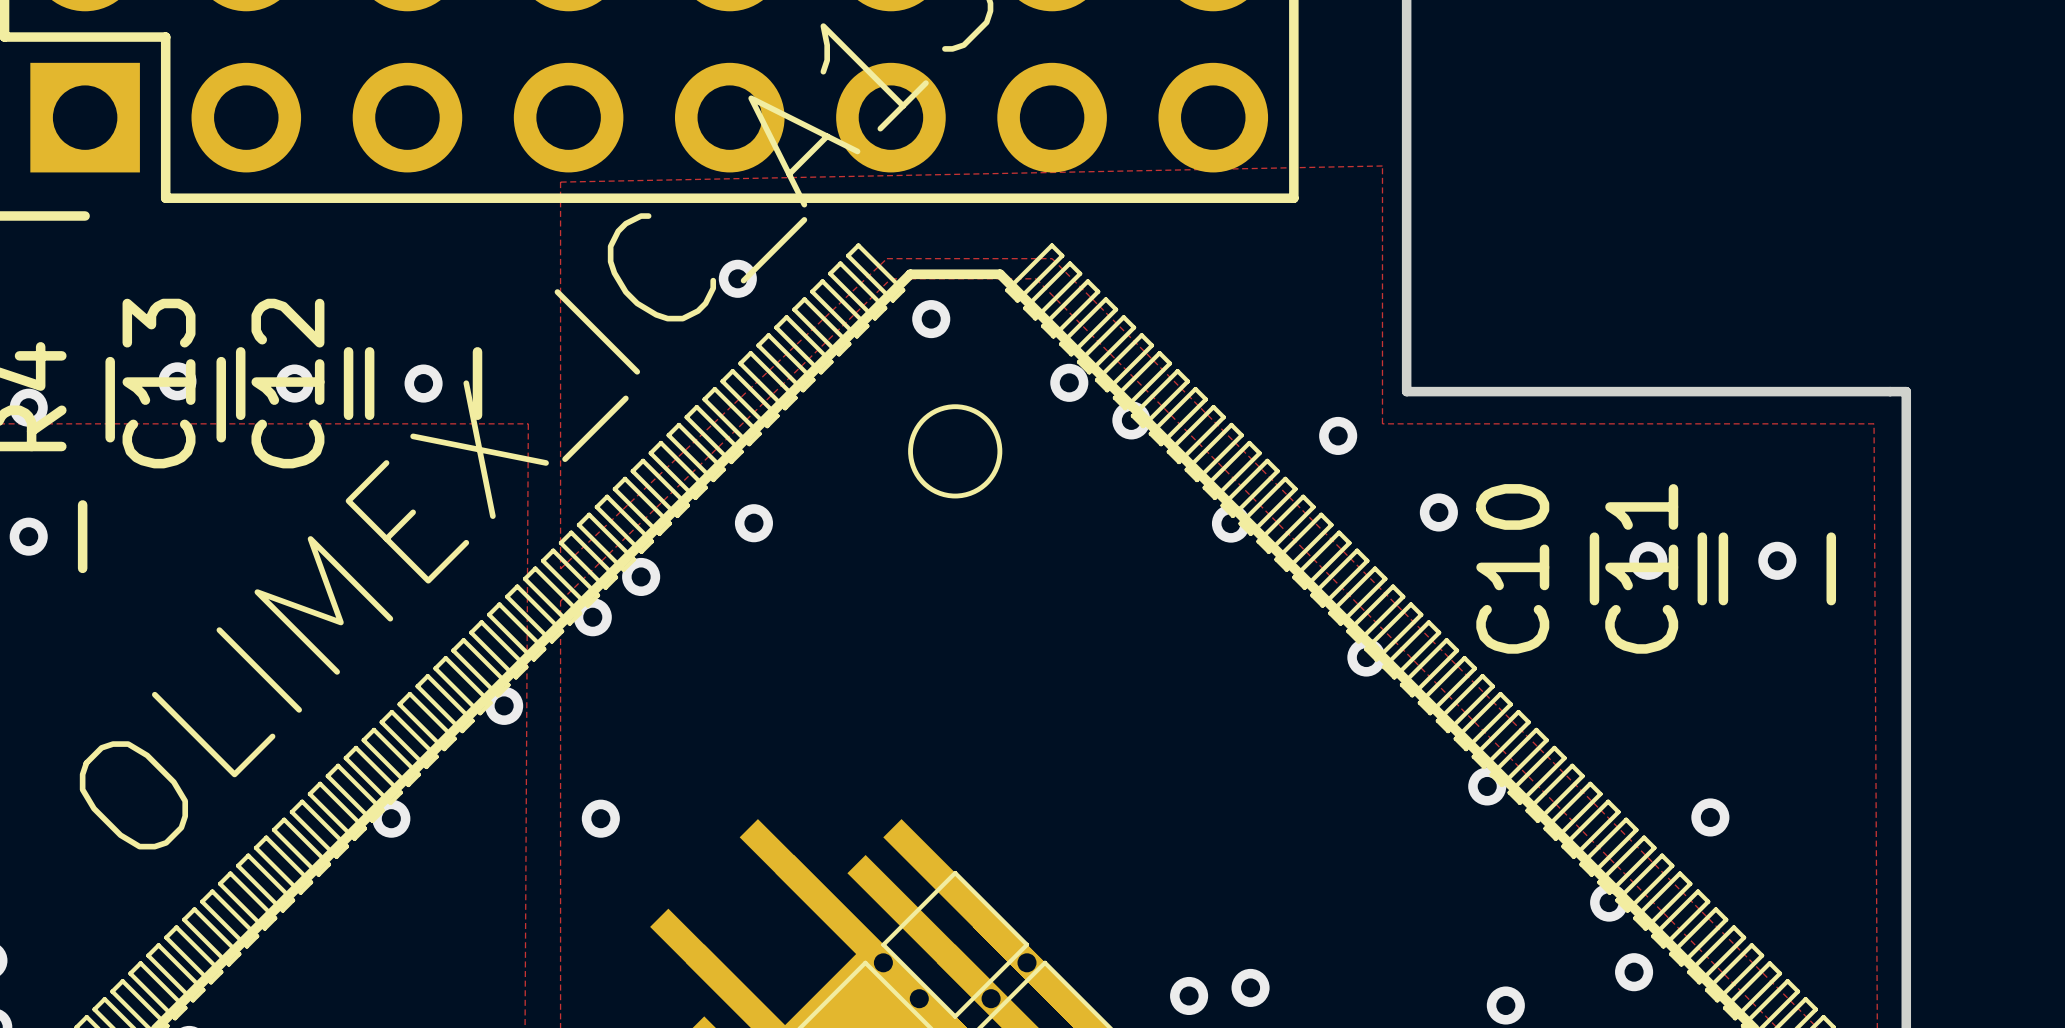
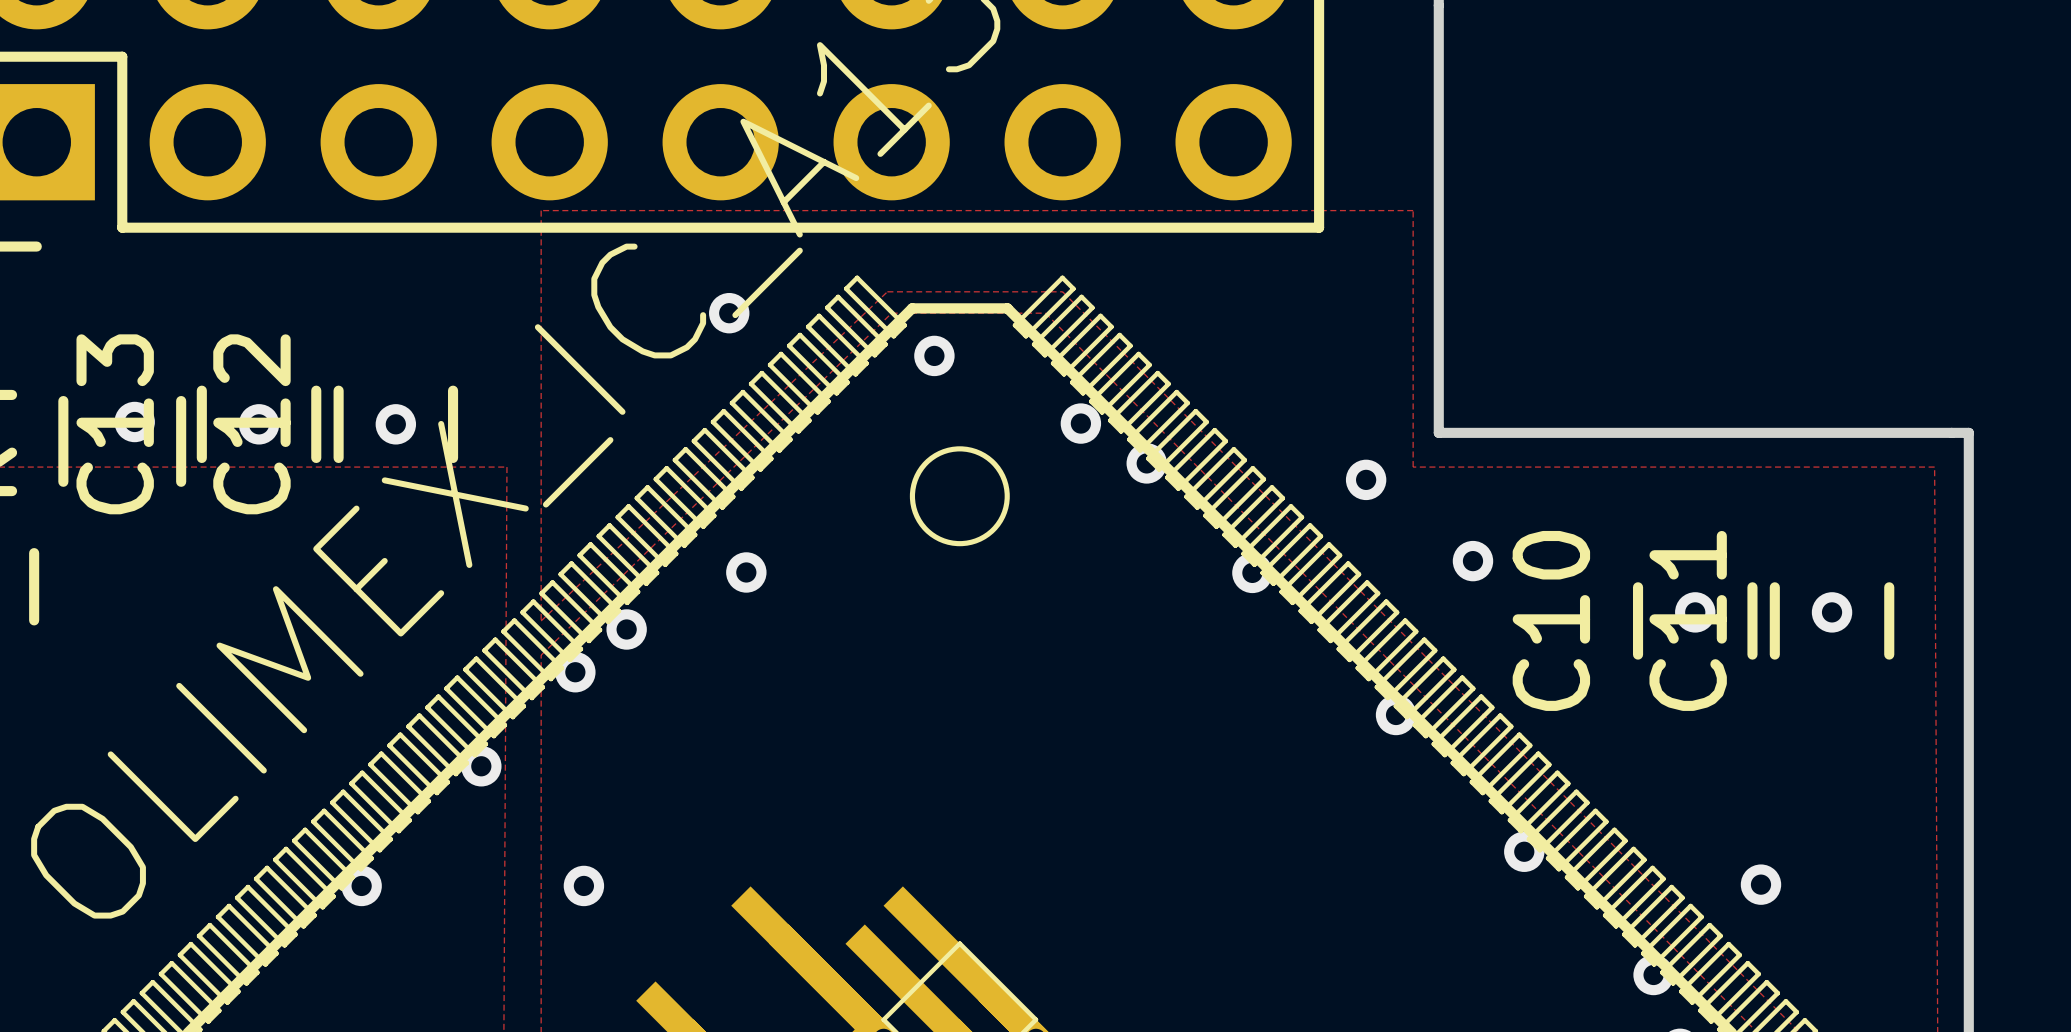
zone outline: (560, 182) (1382, 165) (1382, 182) -> (541, 210) (1413, 210)

